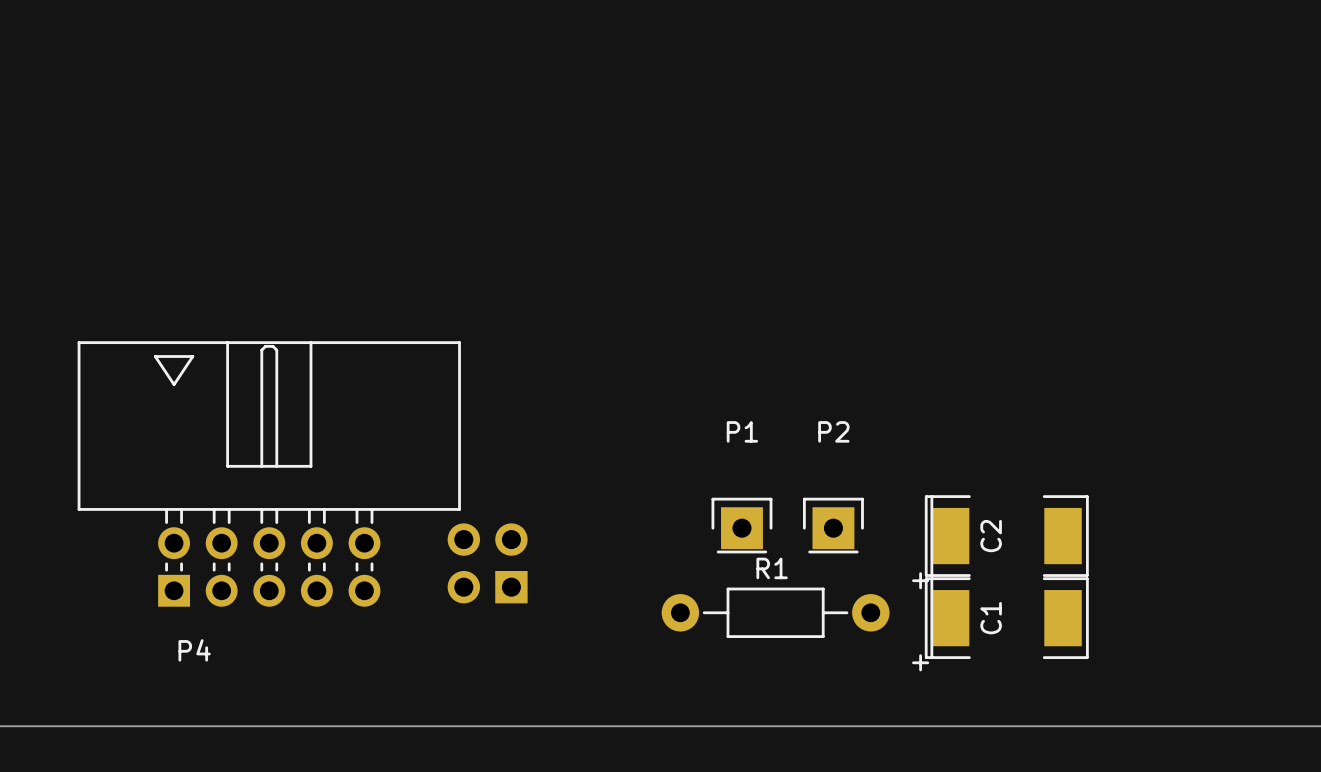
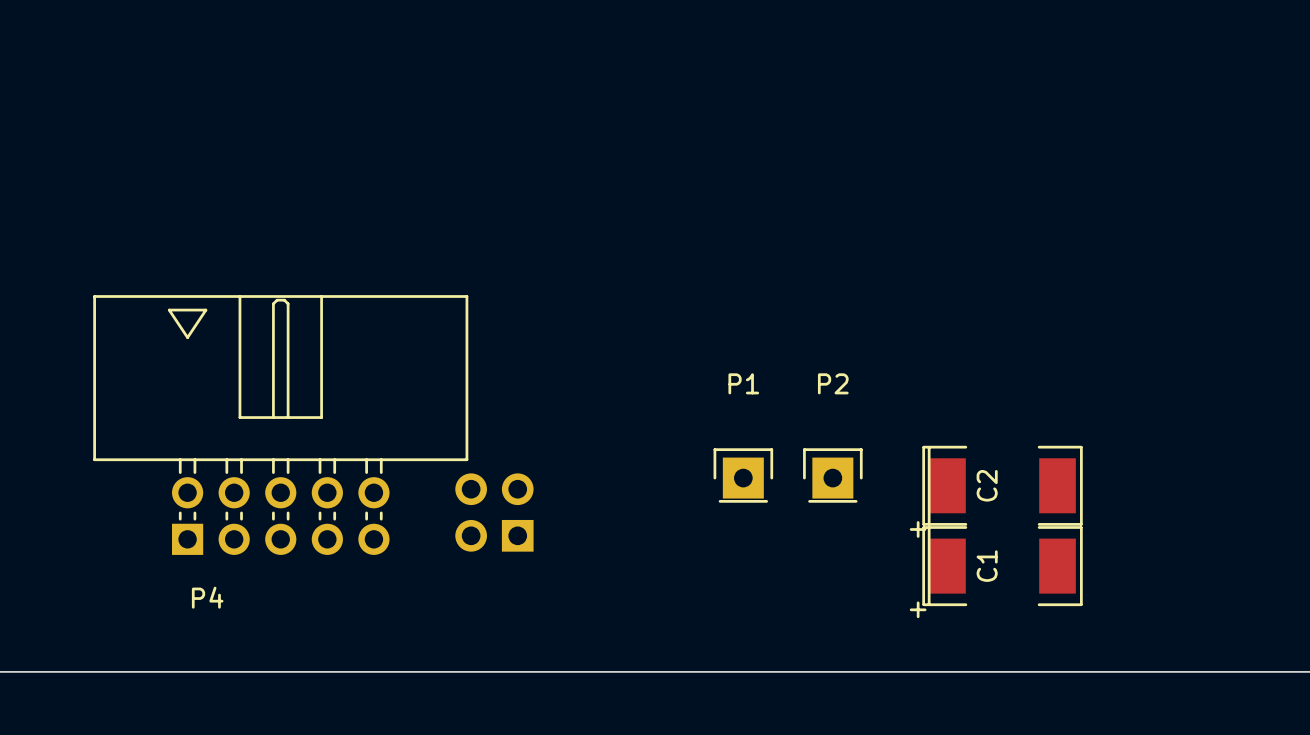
R1: (775, 612) -> none

